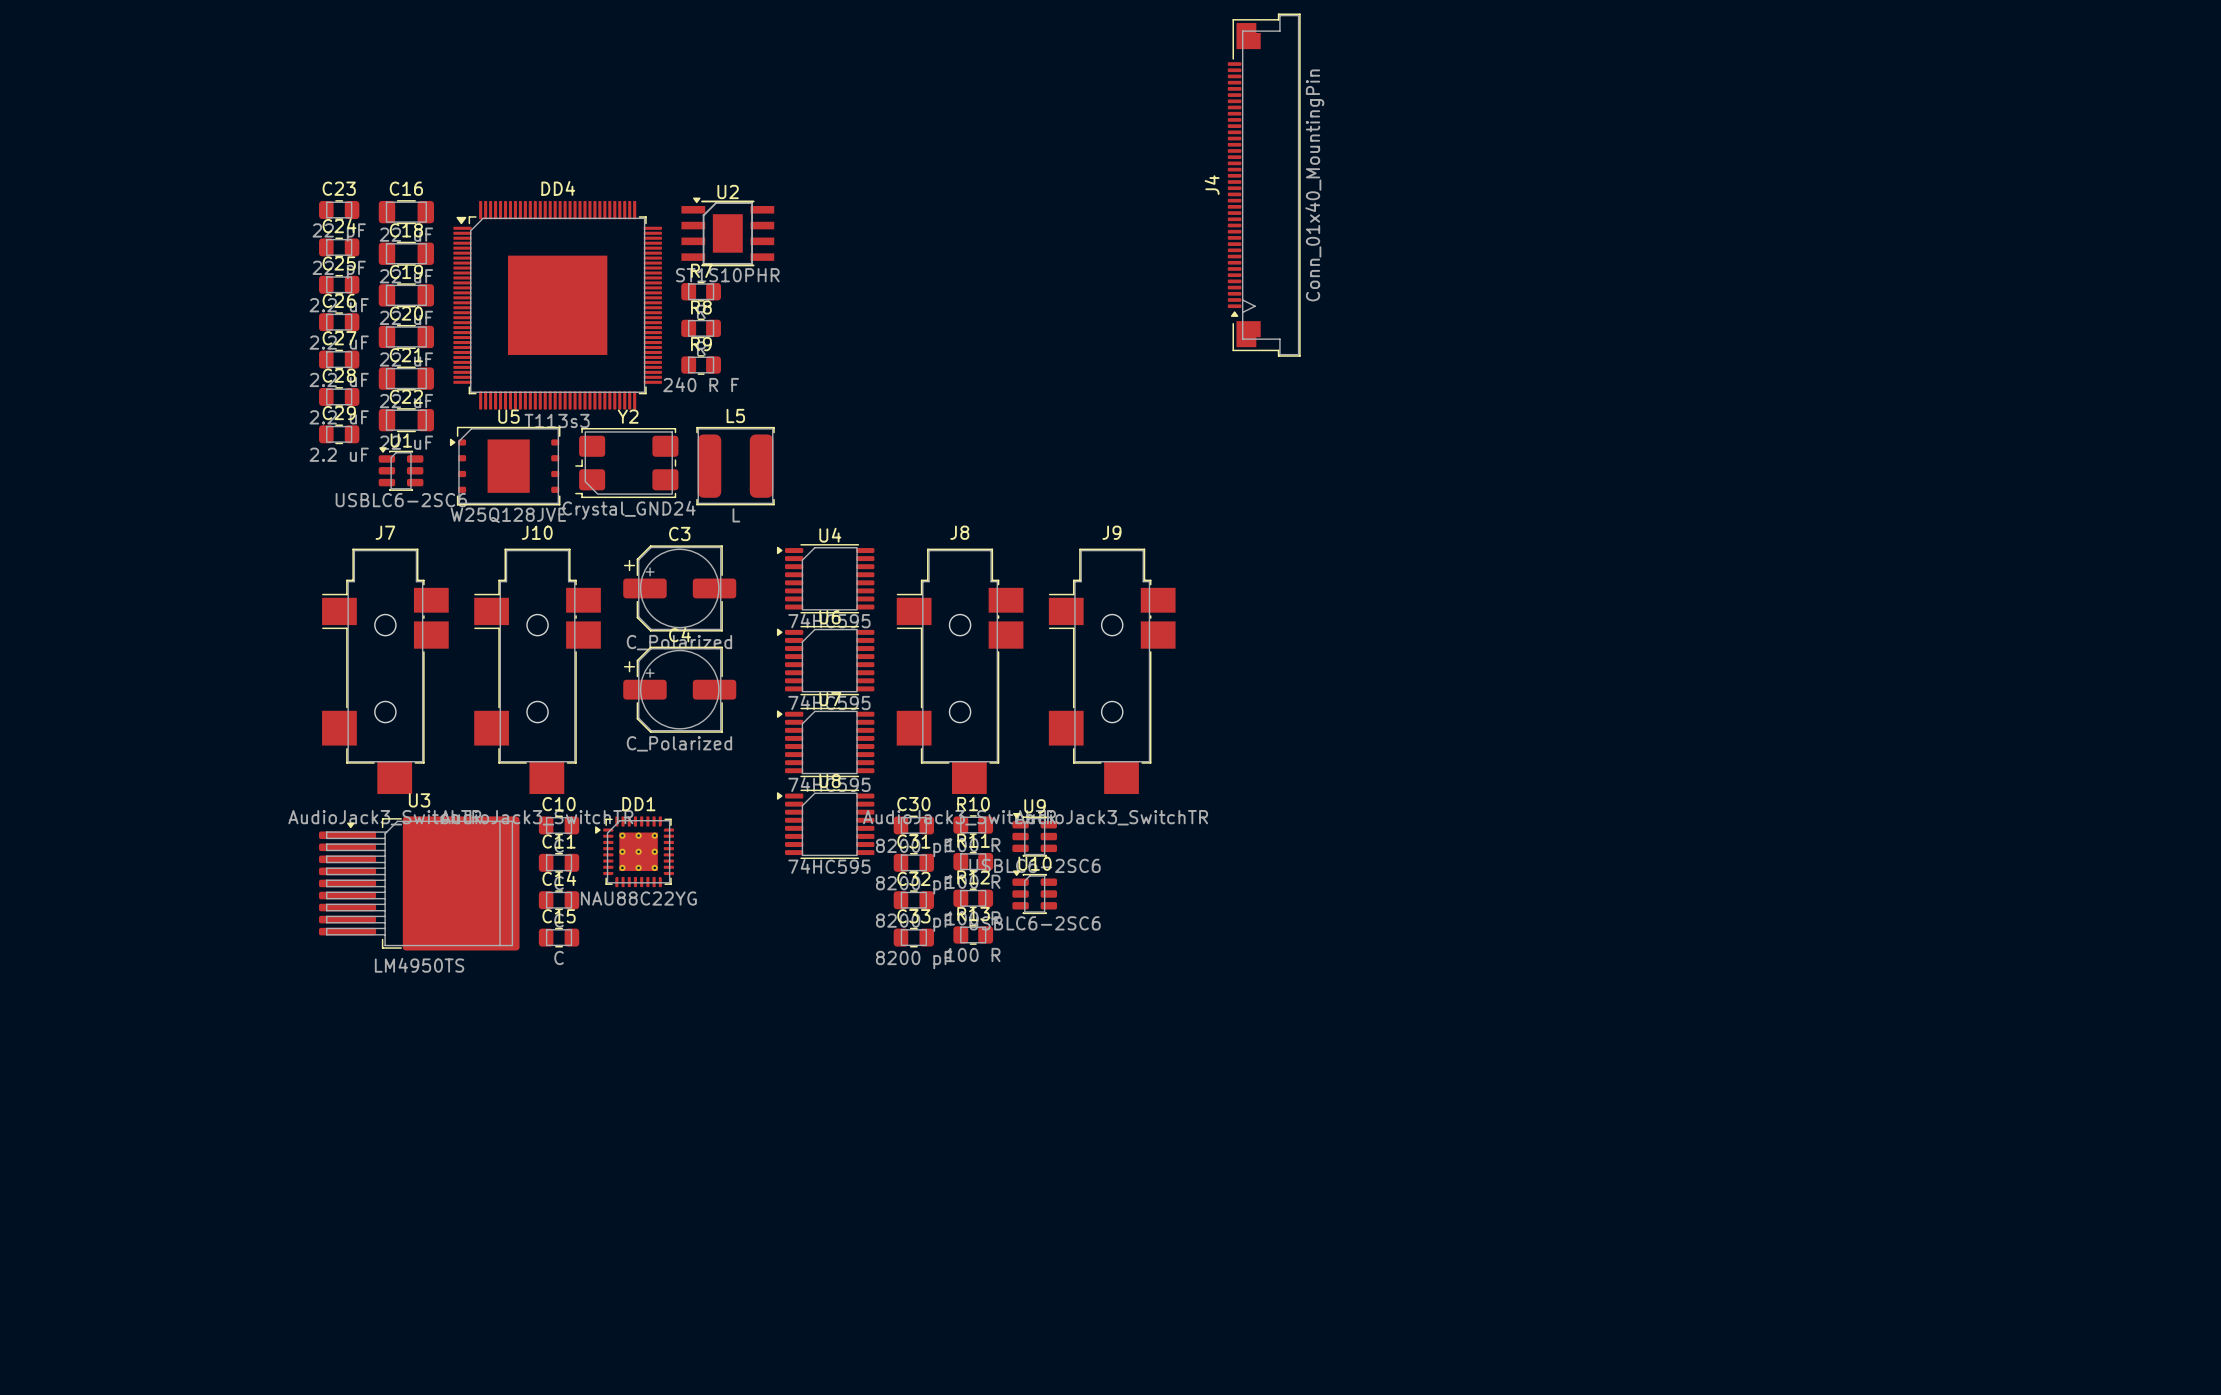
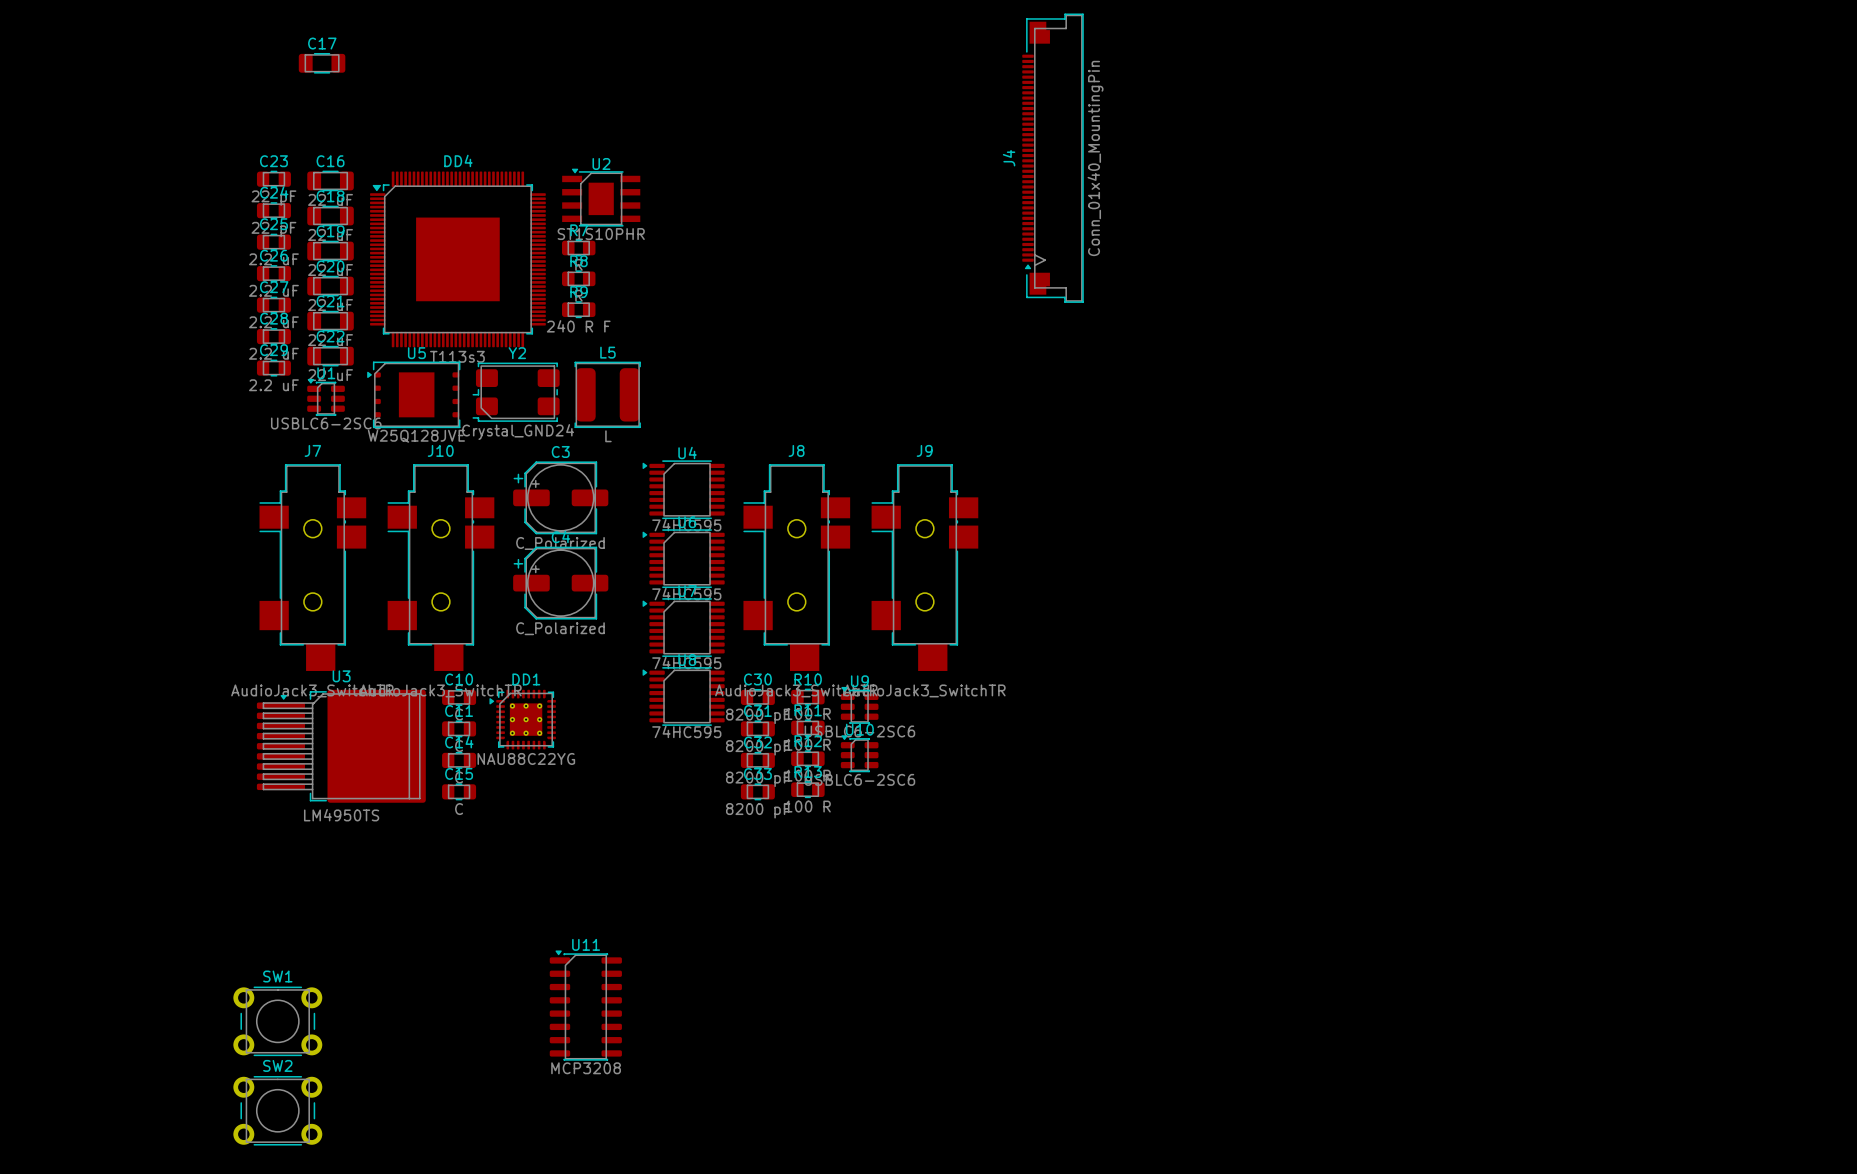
C17: none -> (322, 63)
U11: none -> MCP3208 (585, 1005)
SW1: none -> (277, 1021)
SW2: none -> (277, 1110)

